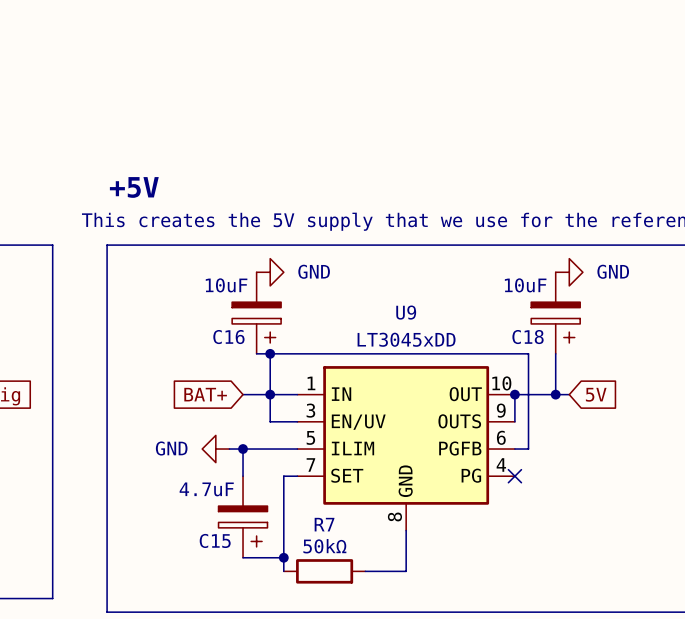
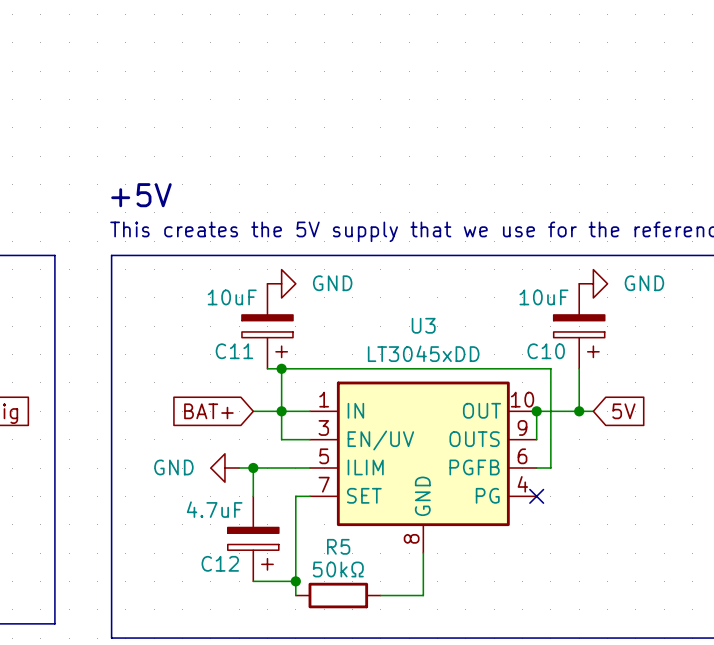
U9 name: U9 (406, 312) -> U3 (423, 325)
C16 name: C16 (228, 337) -> C11 (234, 351)
C18 name: C18 (528, 337) -> C10 (546, 351)
R7 name: R7 (324, 524) -> R5 (338, 546)
C15 name: C15 (215, 540) -> C12 (220, 563)

